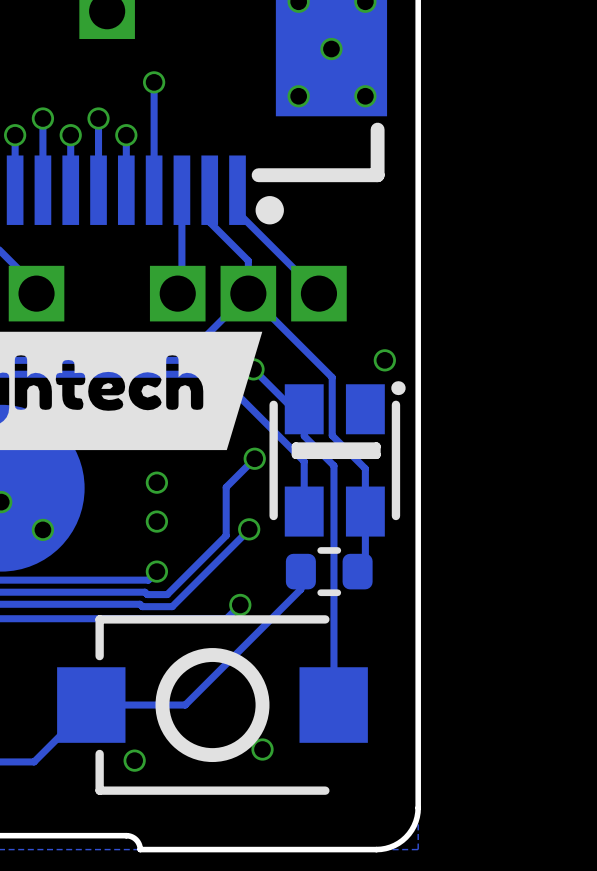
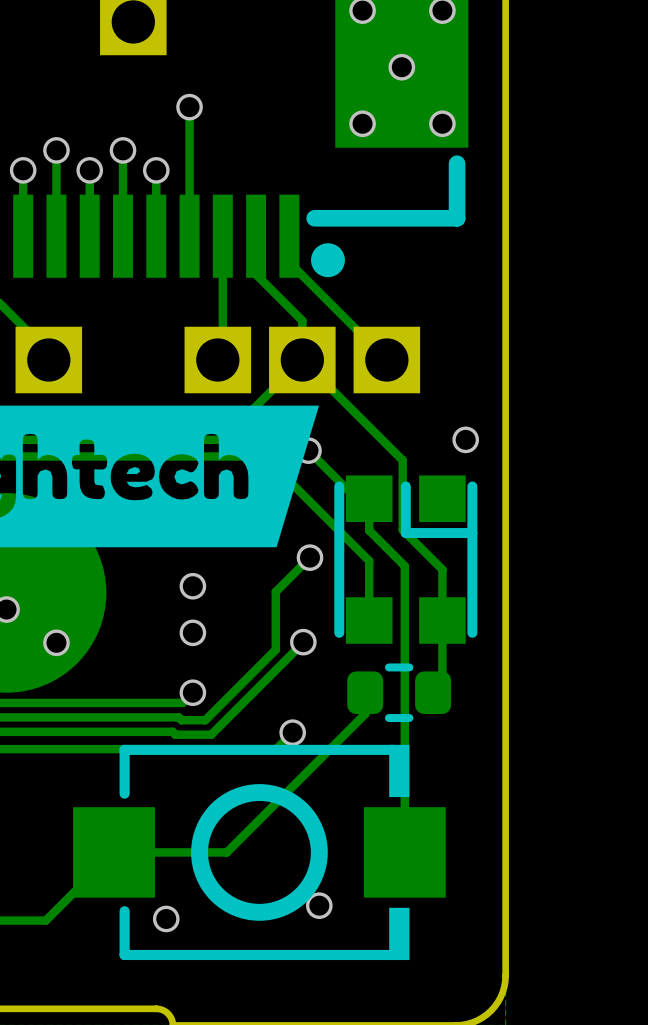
part footprint: [269, 381, 406, 537] -> [334, 475, 478, 644]
part footprint: [57, 615, 368, 795] -> [73, 744, 446, 961]

